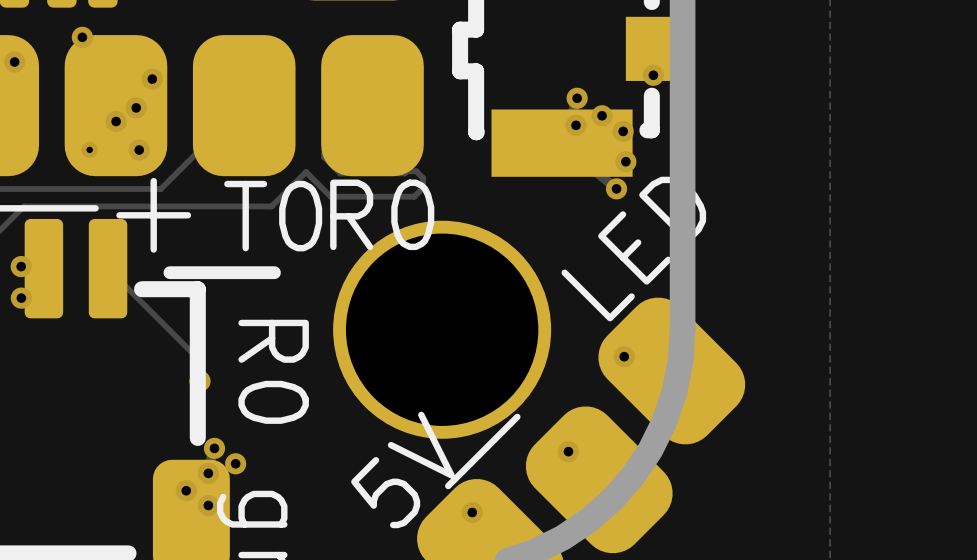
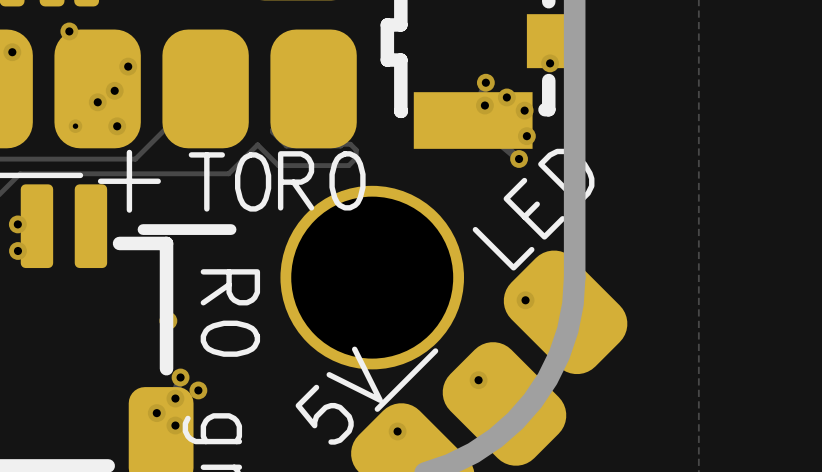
track: (108, 268) (200, 360) (200, 381) -> none

